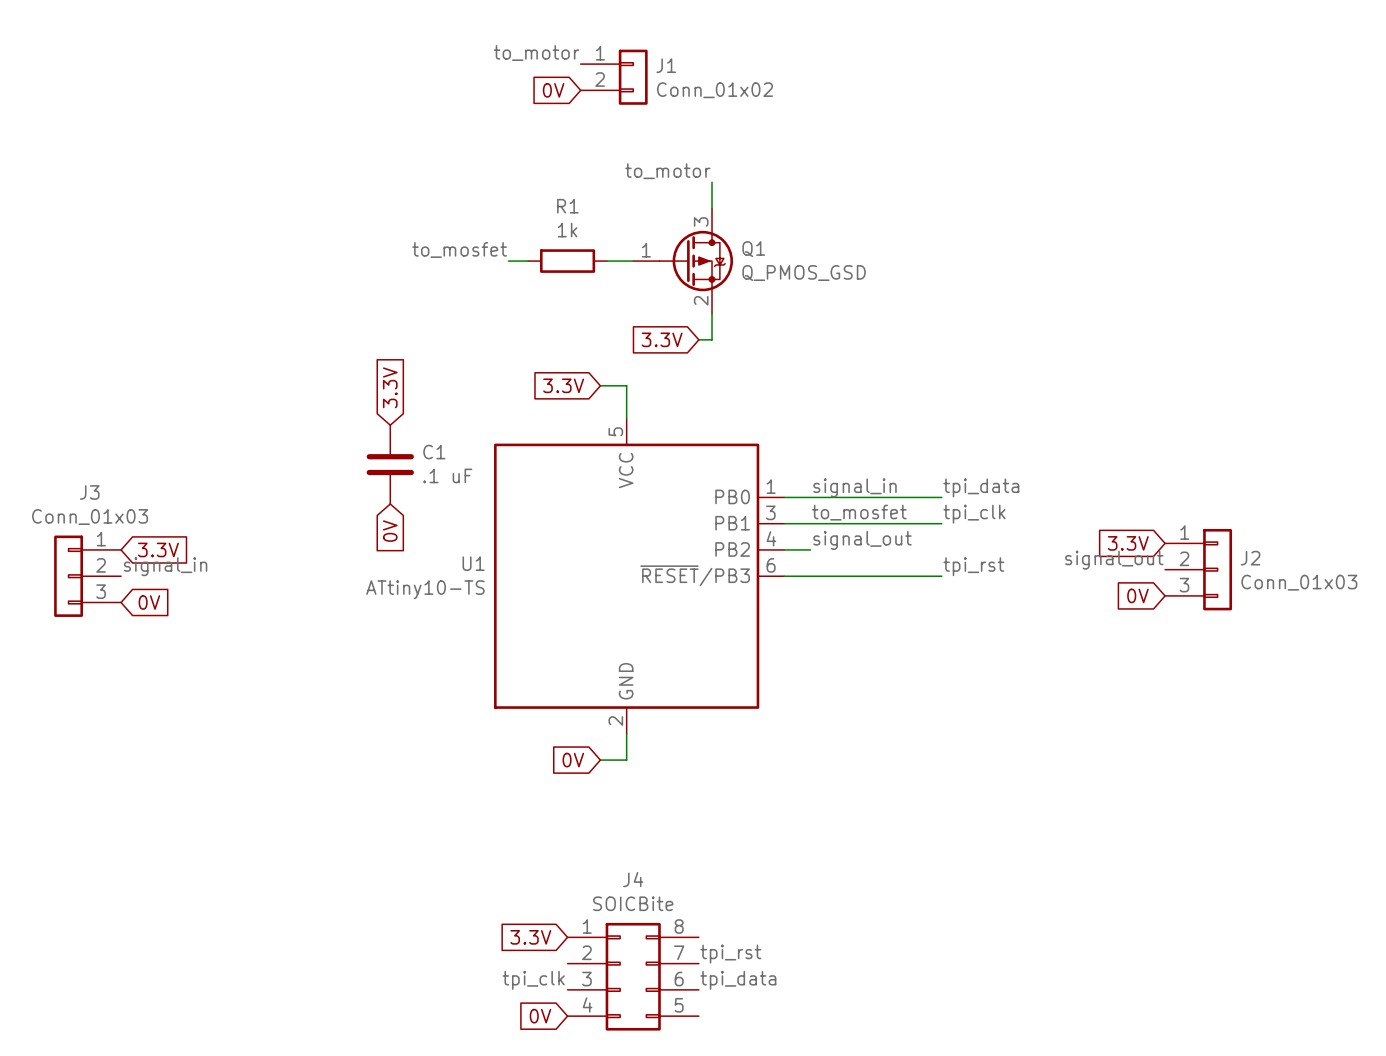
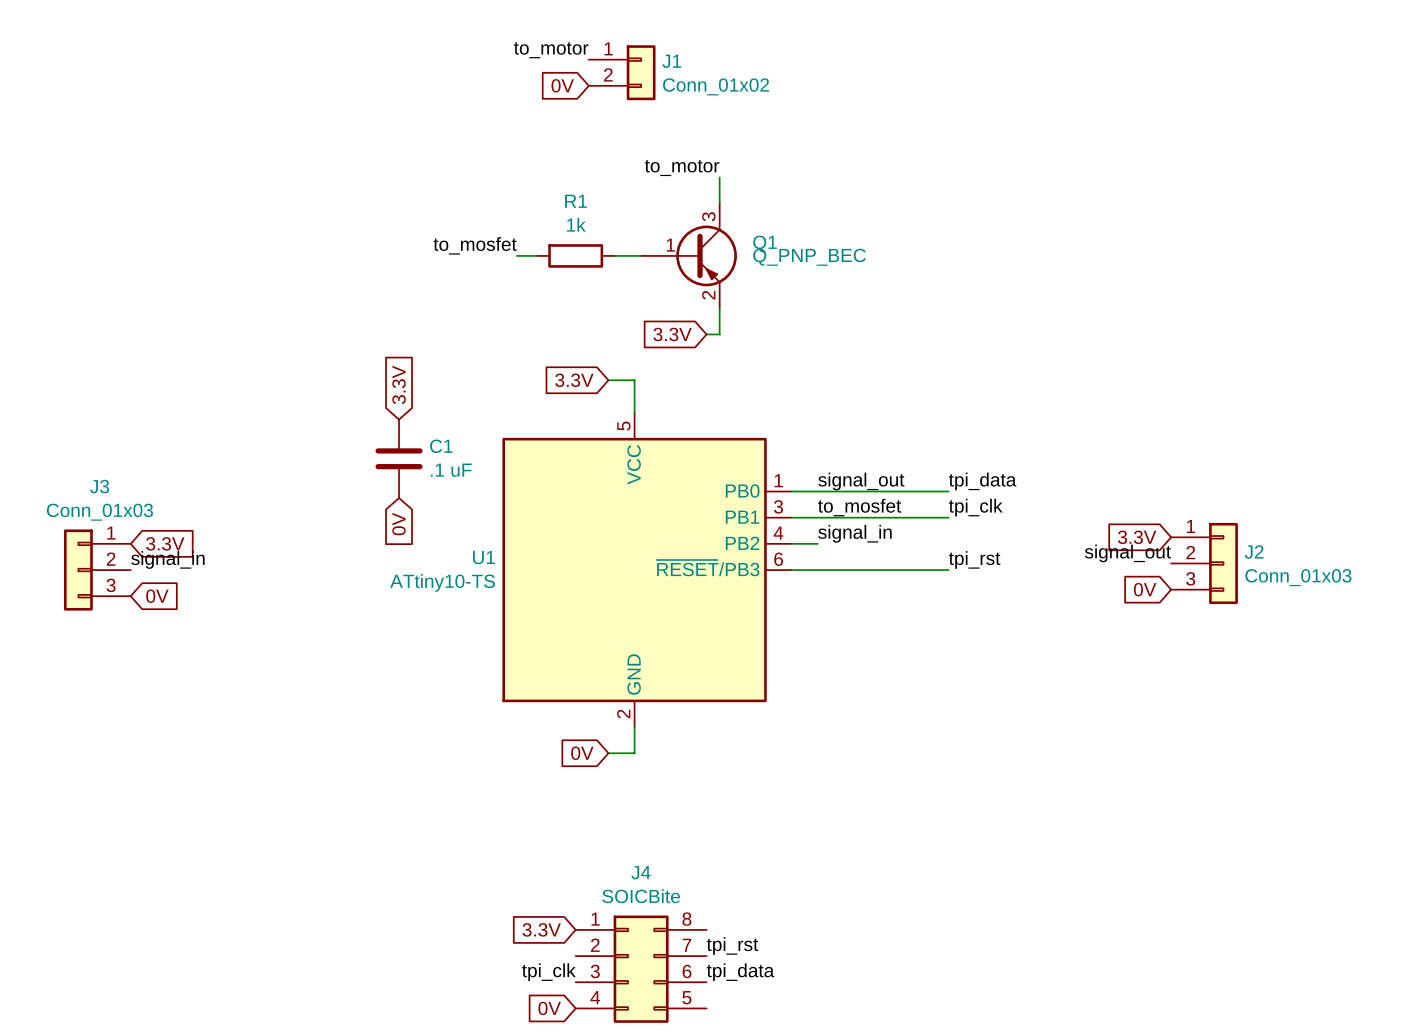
Q1 symbol: [633, 208, 734, 314] -> [641, 203, 737, 309]
Q1 value: Q_PMOS_GSD (804, 273) -> Q_PNP_BEC (809, 257)
label: signal_in (855, 487) -> signal_out (861, 481)
label: signal_out (862, 540) -> signal_in (854, 533)

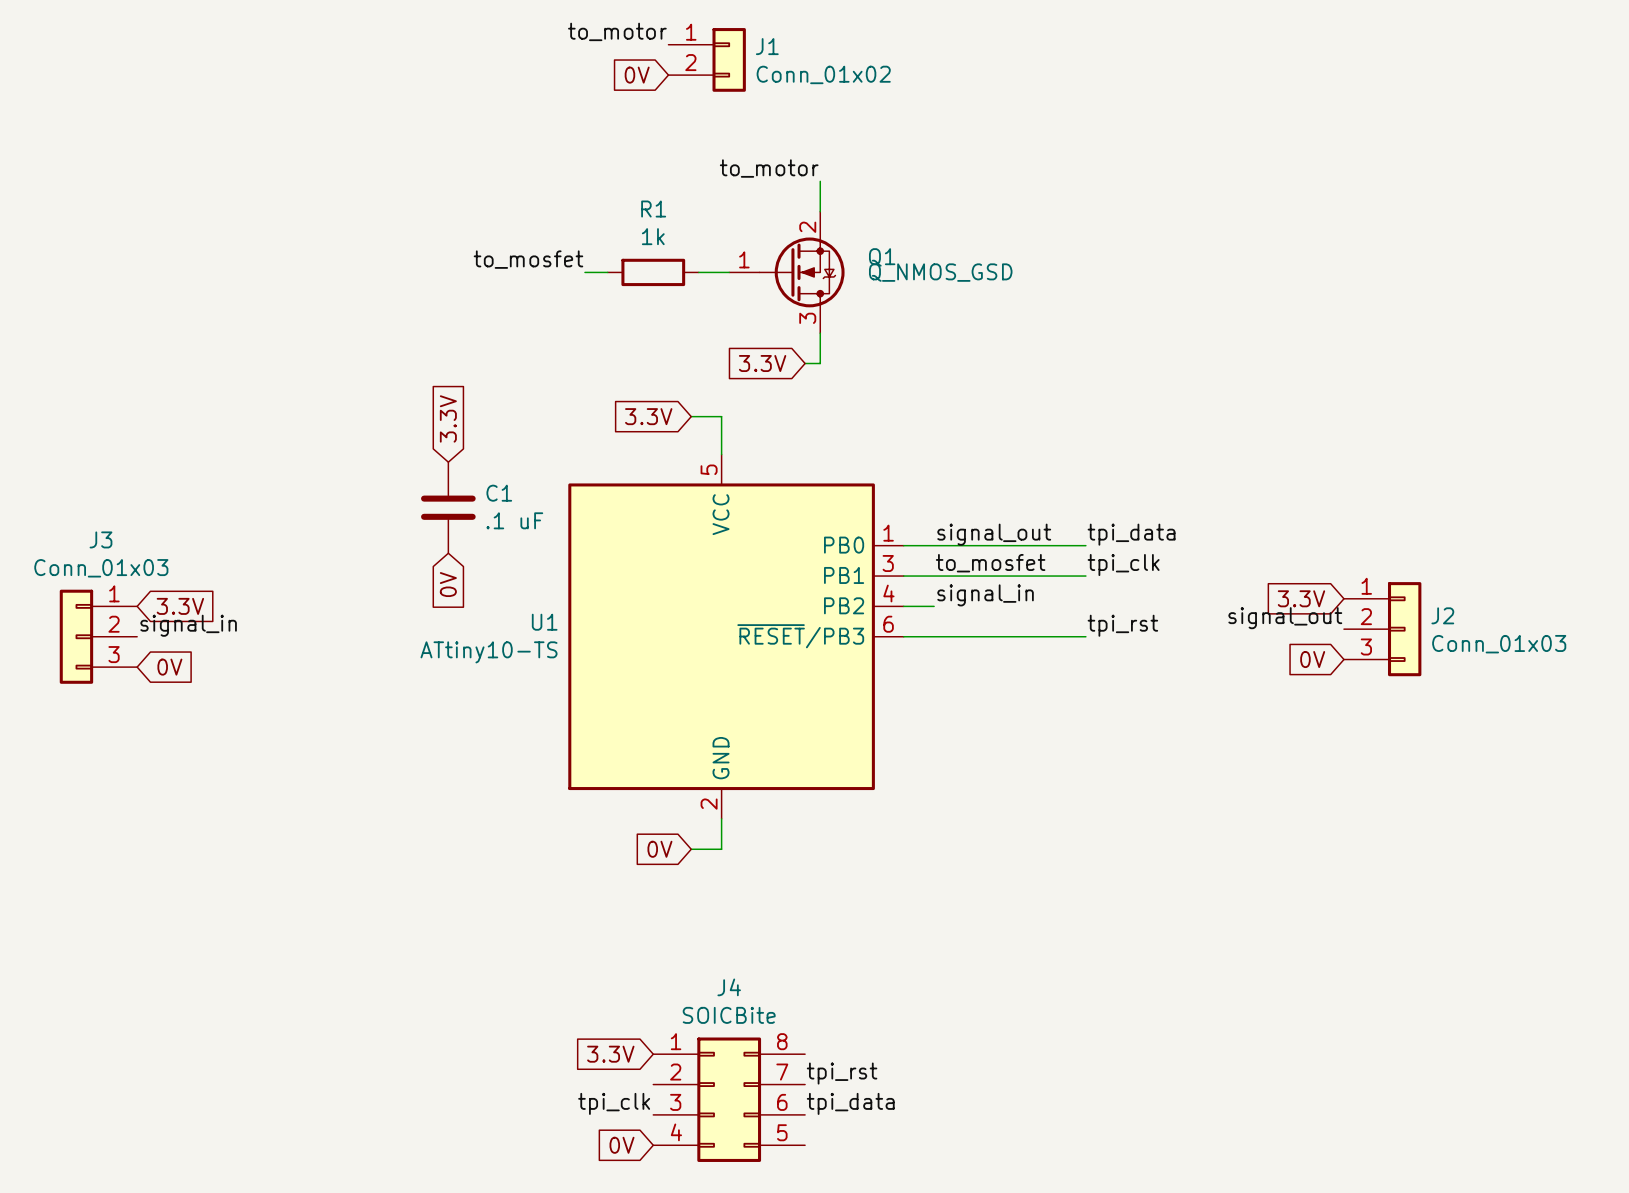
Q1 symbol: [641, 203, 737, 309] -> [729, 211, 845, 334]
Q1 value: Q_PNP_BEC (809, 257) -> Q_NMOS_GSD (940, 272)

